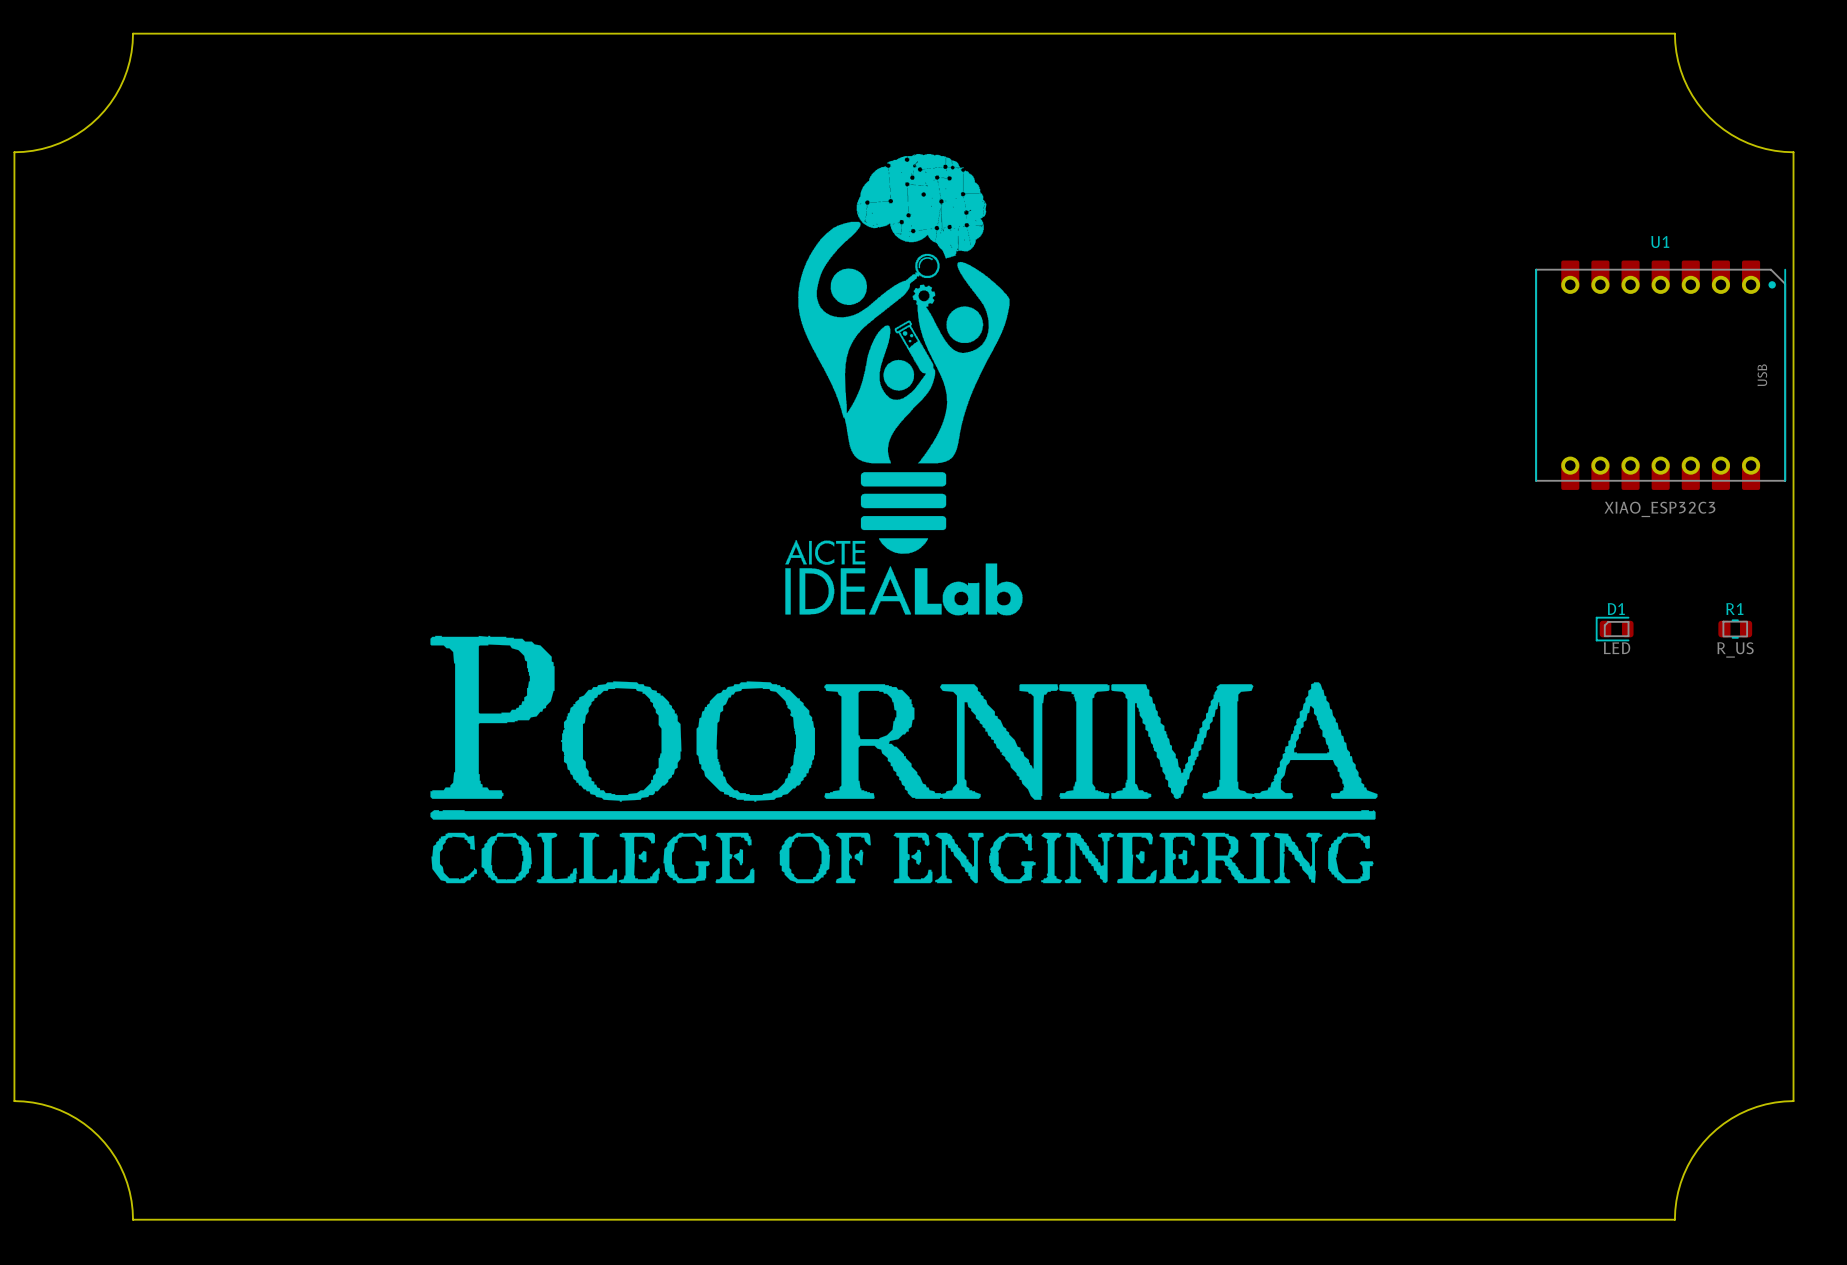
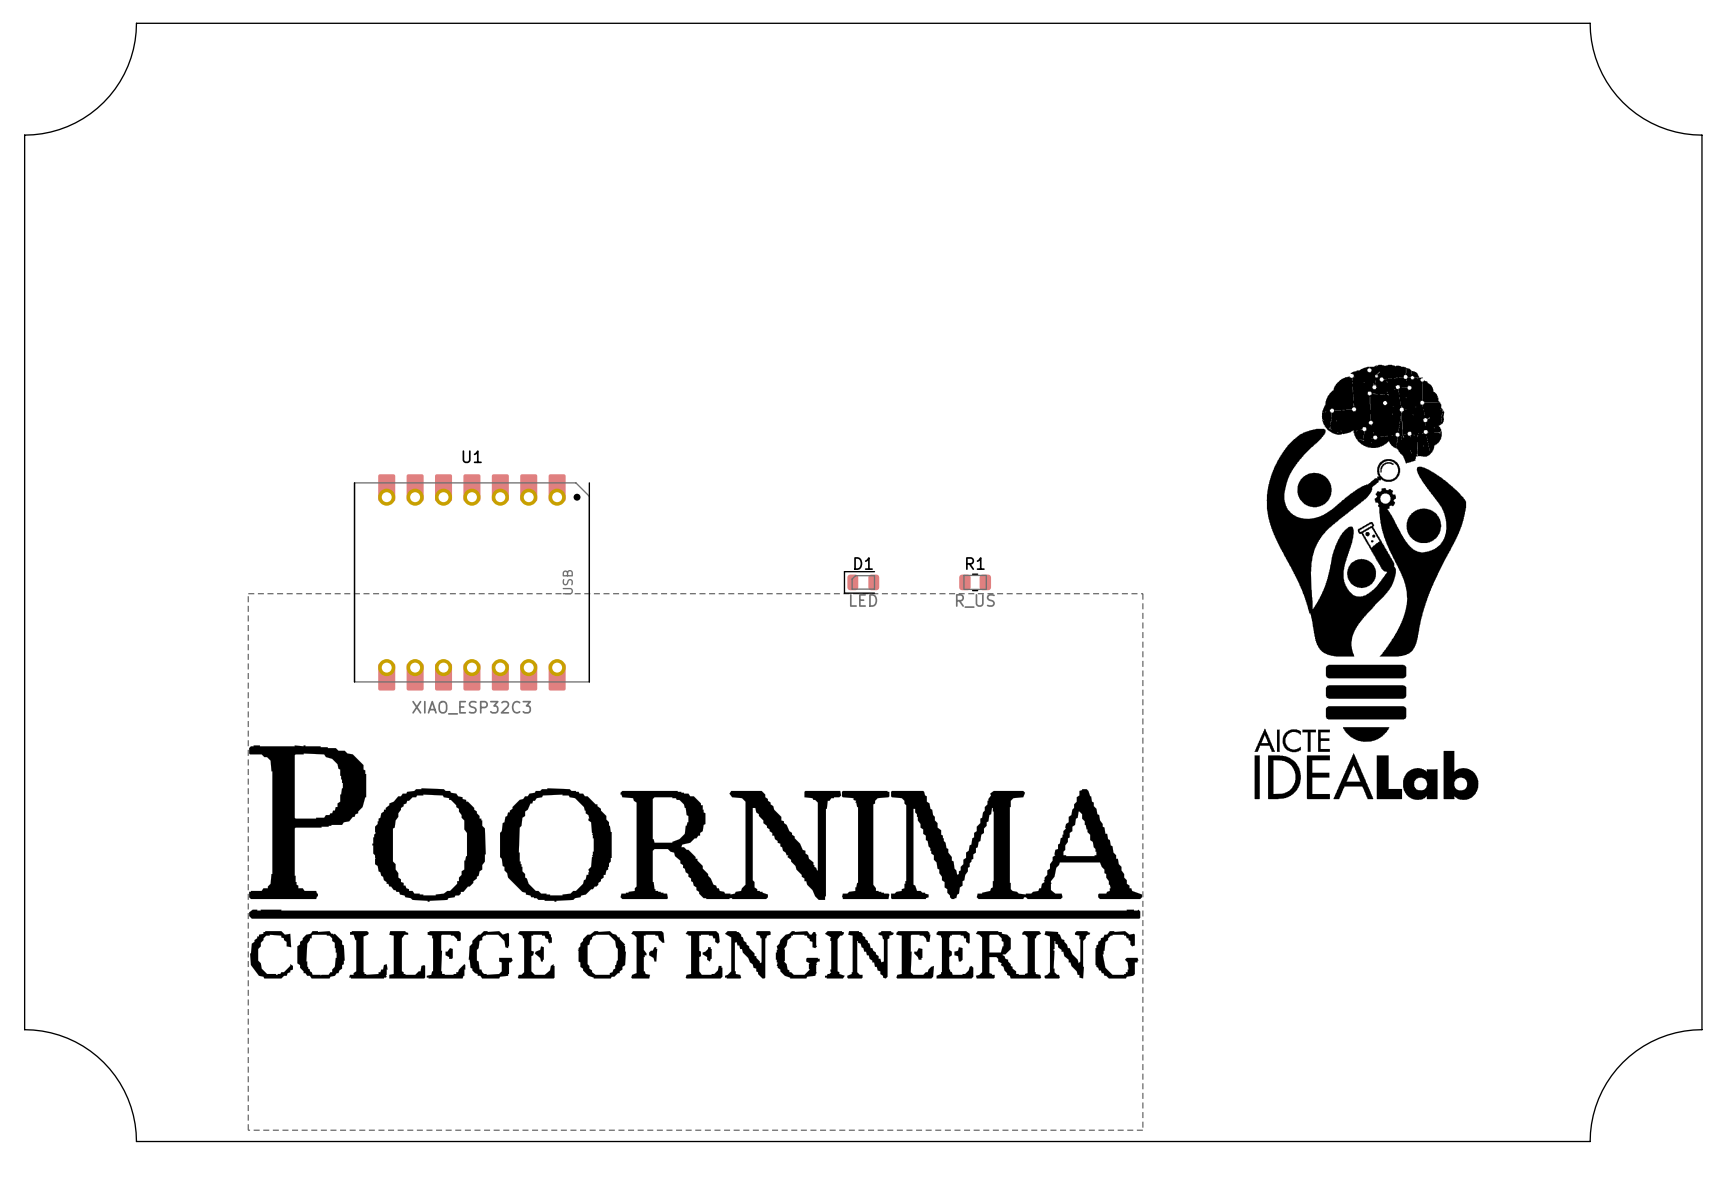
drawing: [785, 153, 1023, 616] -> none
U1 position: (1660, 375) -> (471, 582)
drawing: none -> [1254, 364, 1479, 800]
D1 position: (1614, 629) -> (861, 582)
R1 position: (1735, 629) -> (975, 582)
drawing: [430, 635, 1378, 884] -> none
drawing: none -> [247, 593, 1144, 1131]

